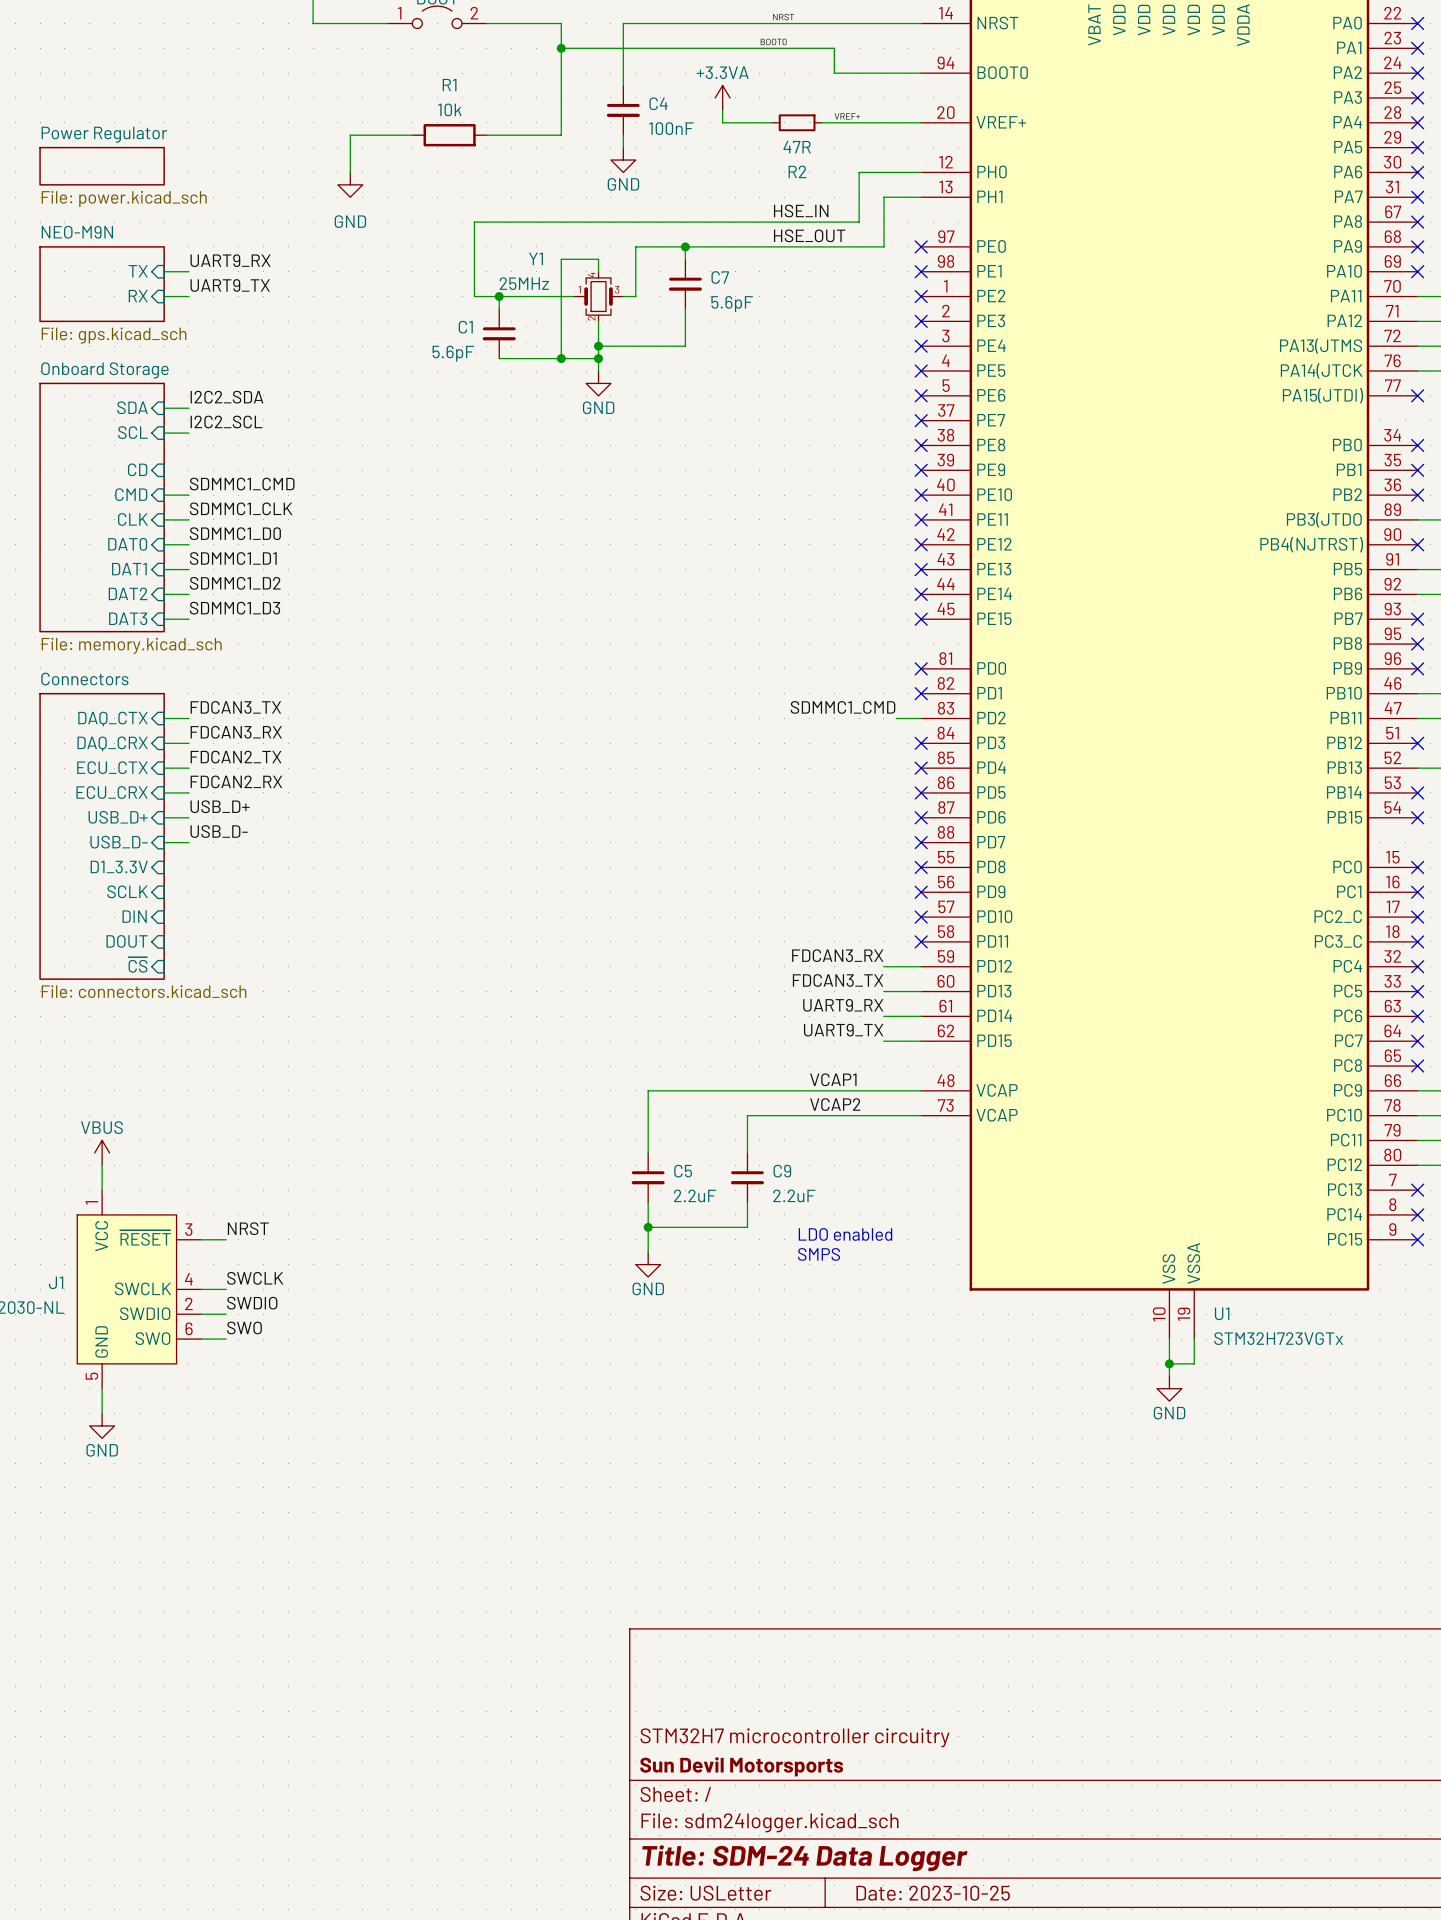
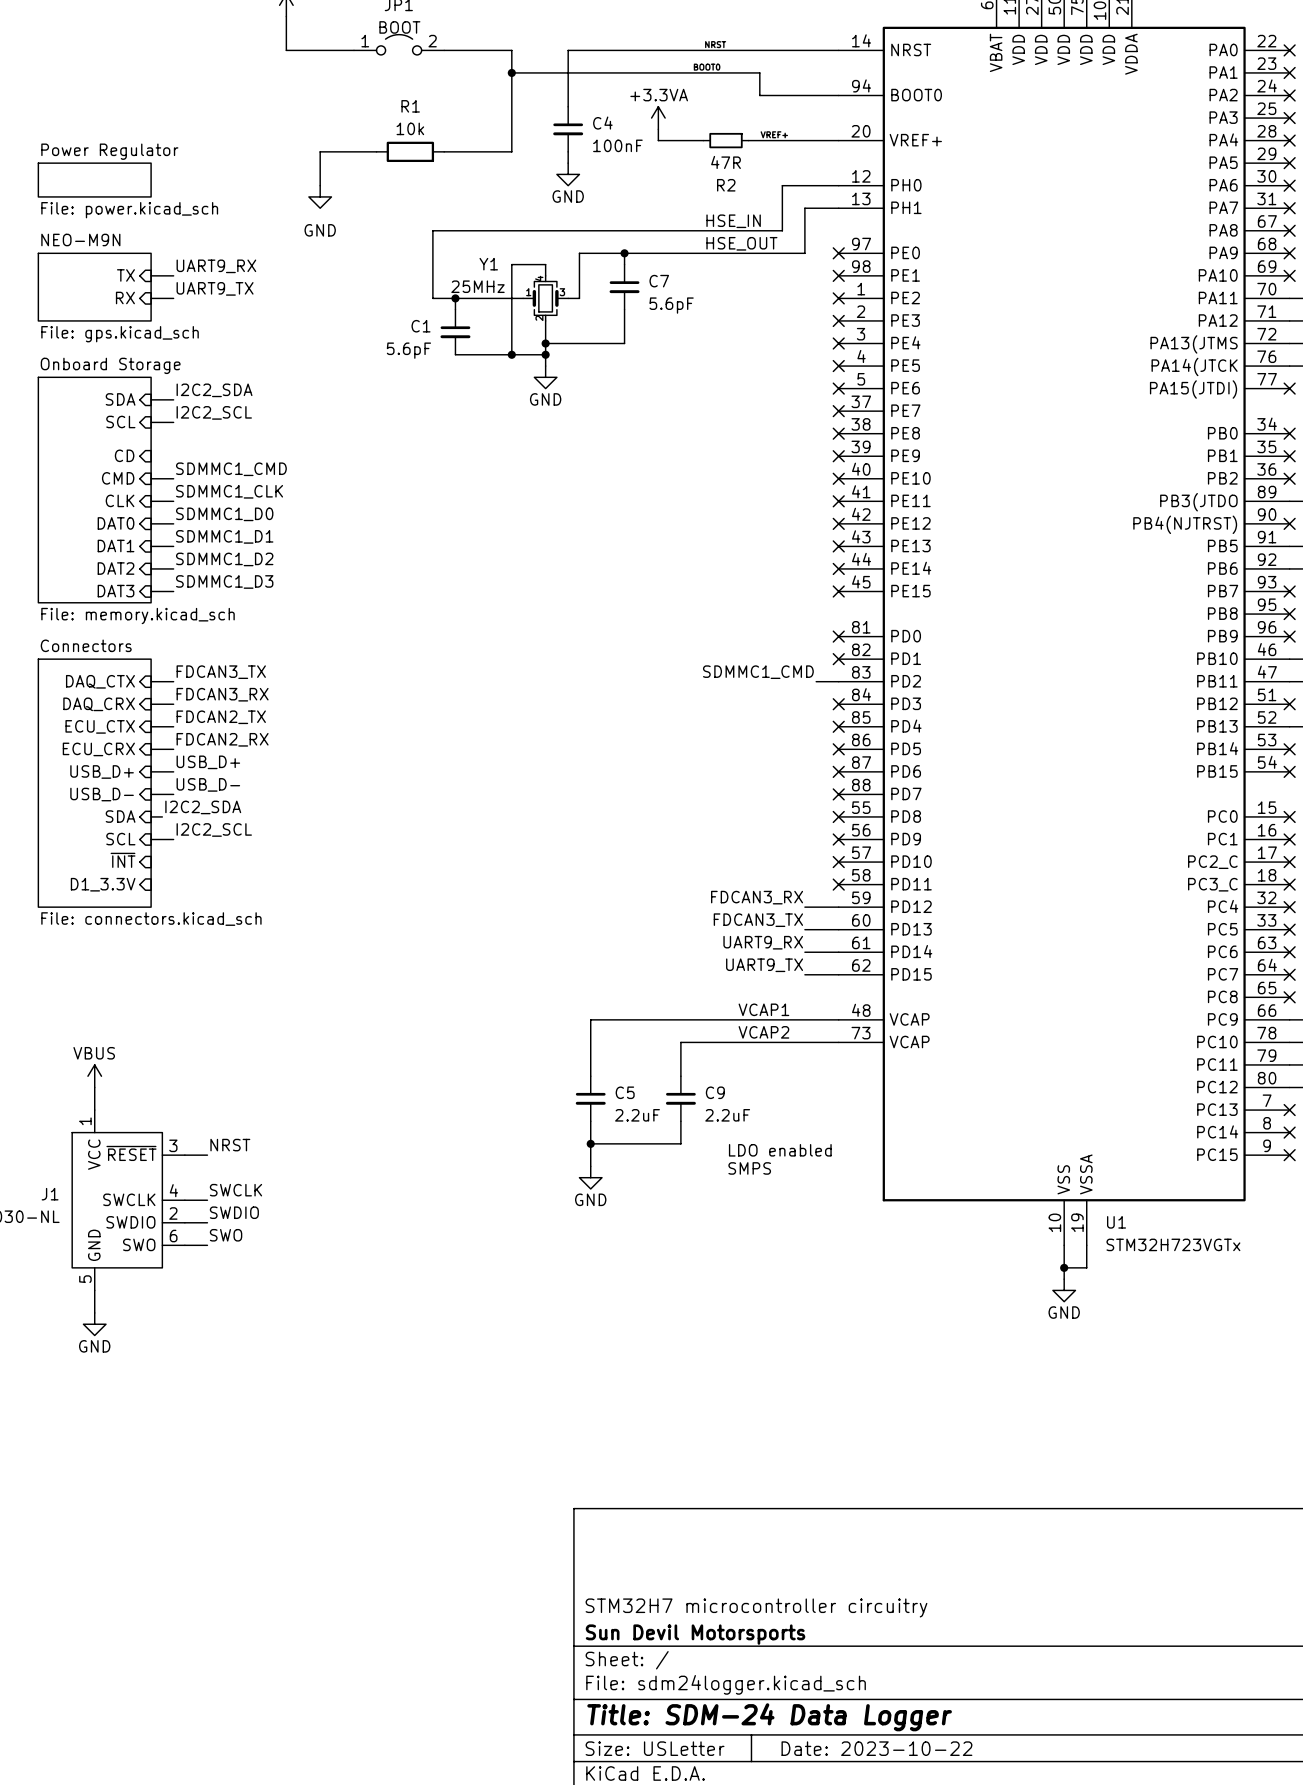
sheet Connectors shape: [39, 692, 165, 980] -> [37, 658, 152, 908]
label: none -> I2C2_SDA (203, 807)
sheet pin: D1_3.3V (119, 867) -> SDA (120, 816)
wire: none -> (151, 816) (162, 816)
label: none -> I2C2_SCL (214, 829)
sheet pin: SCLK (127, 891) -> SCL (120, 839)
wire: none -> (151, 839) (173, 839)
sheet pin: DIN (134, 916) -> ~{INT} (123, 860)
sheet pin: DOUT (127, 941) -> D1_3.3V (103, 884)
sheet pin: ~{CS} (137, 964) -> none
title block: Date: 2023-10-25 (933, 1893) -> Date: 2023-10-22 (876, 1748)

